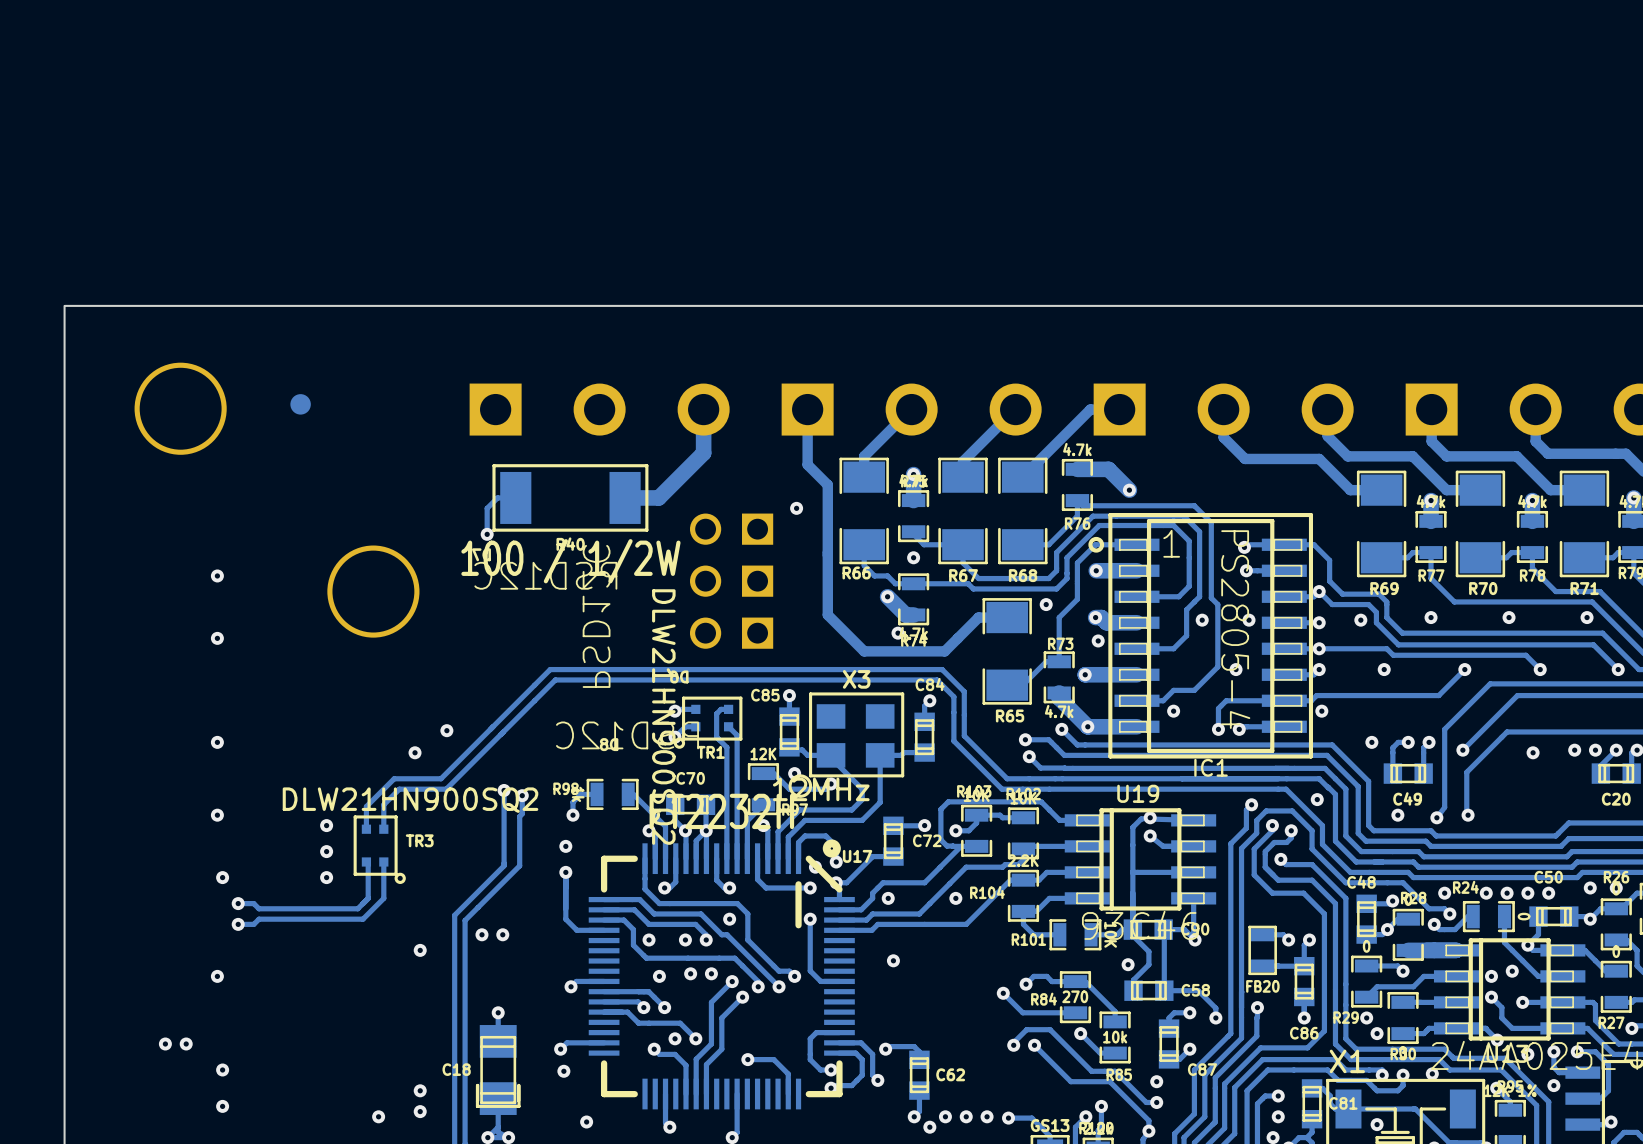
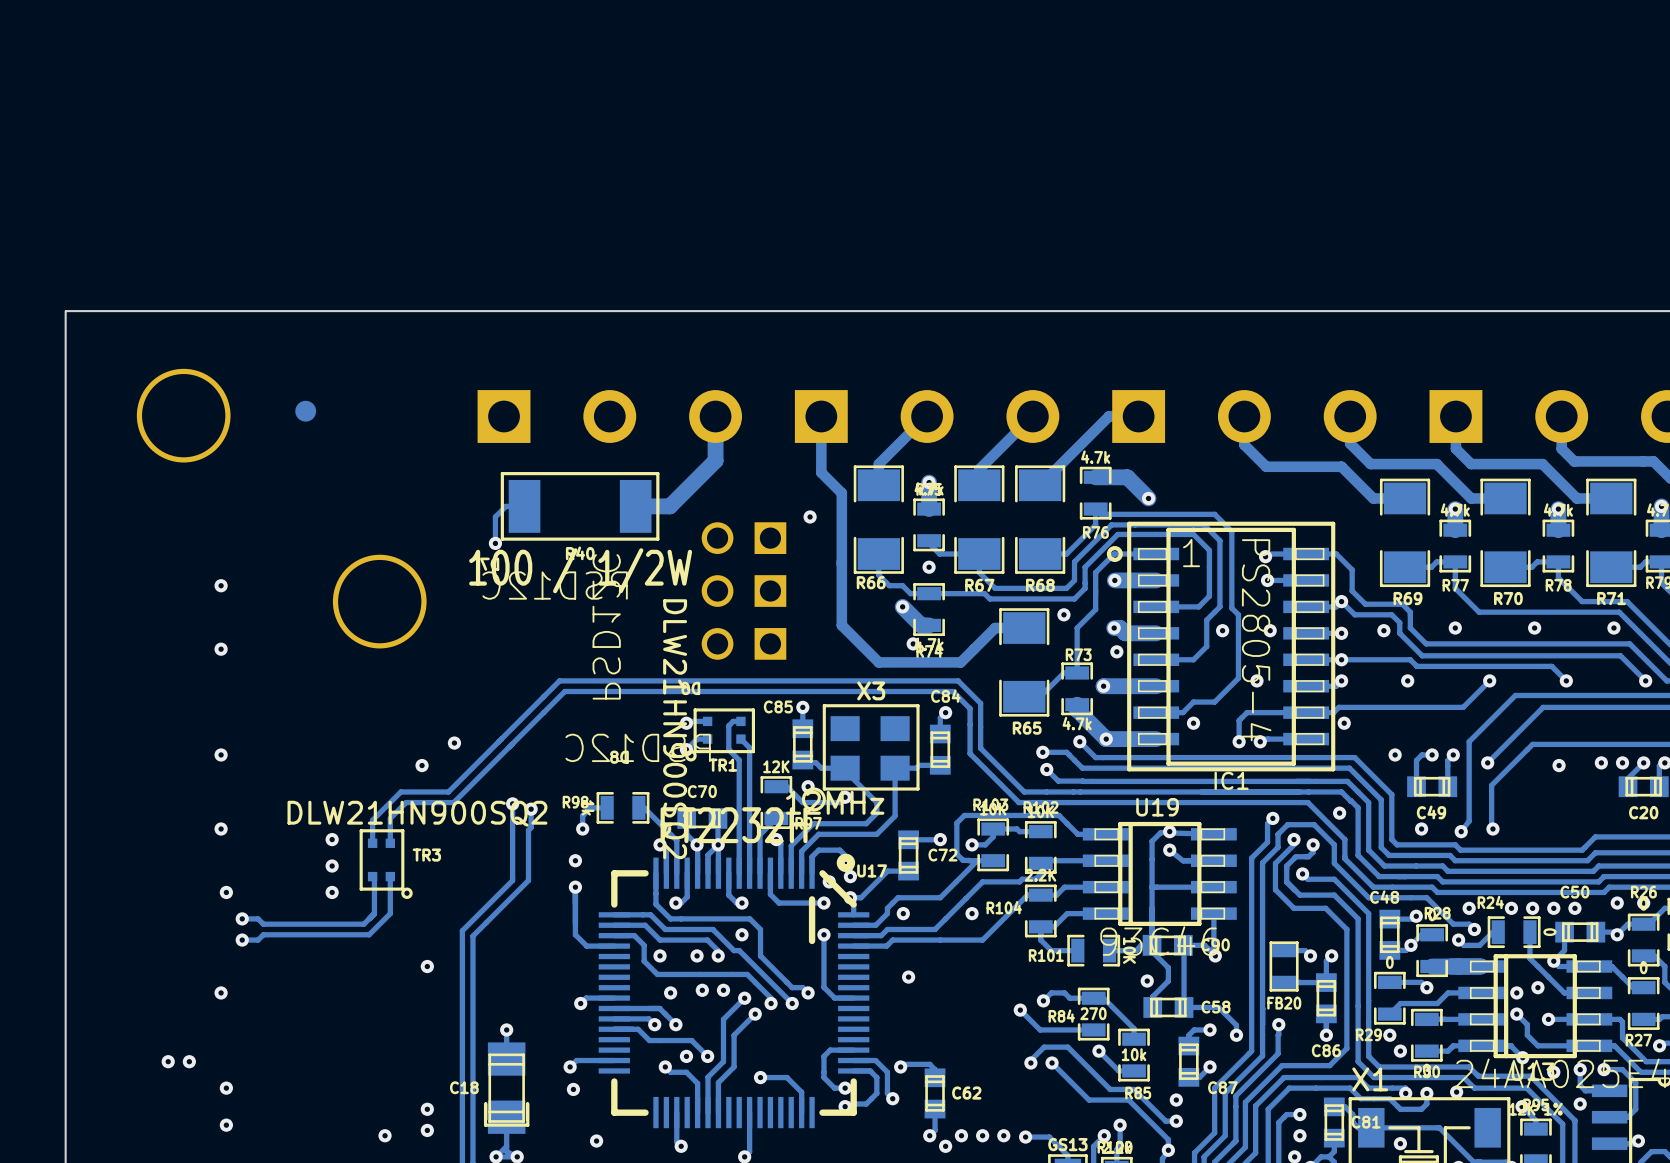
via: (481, 934) -> none
via: (502, 934) -> none

